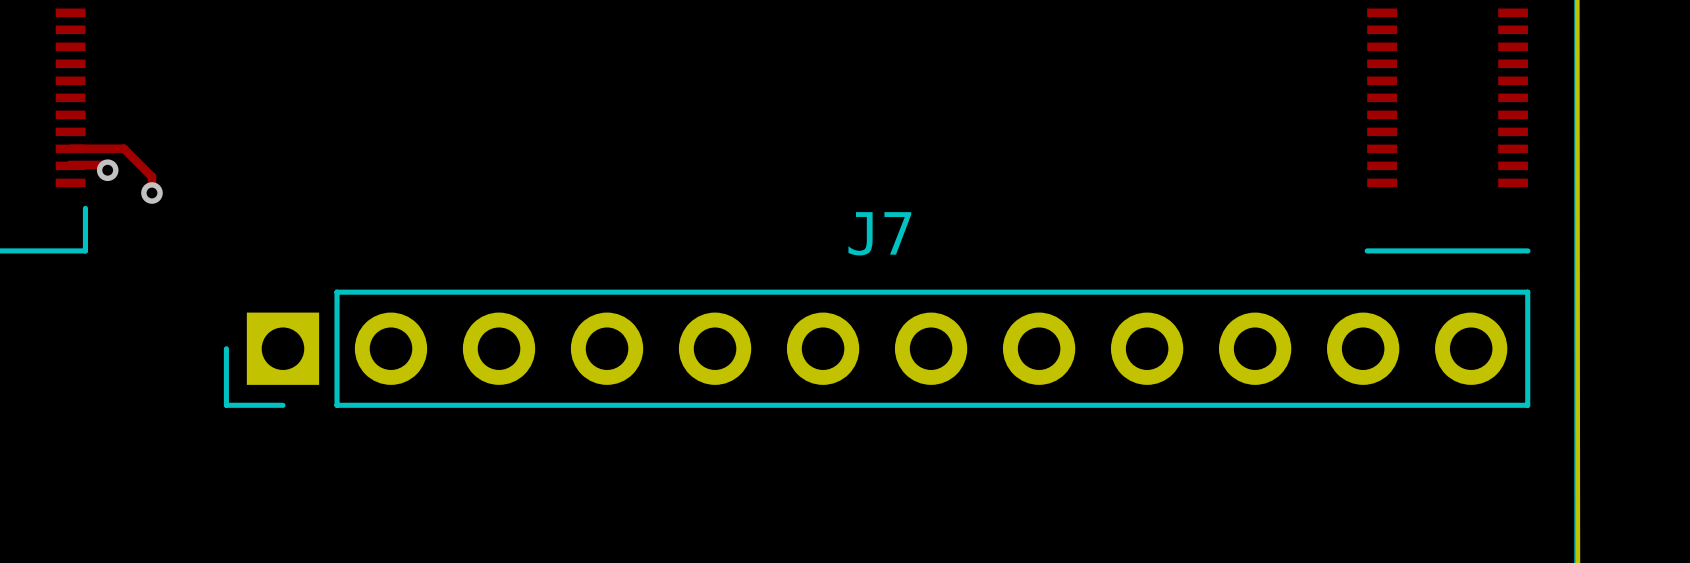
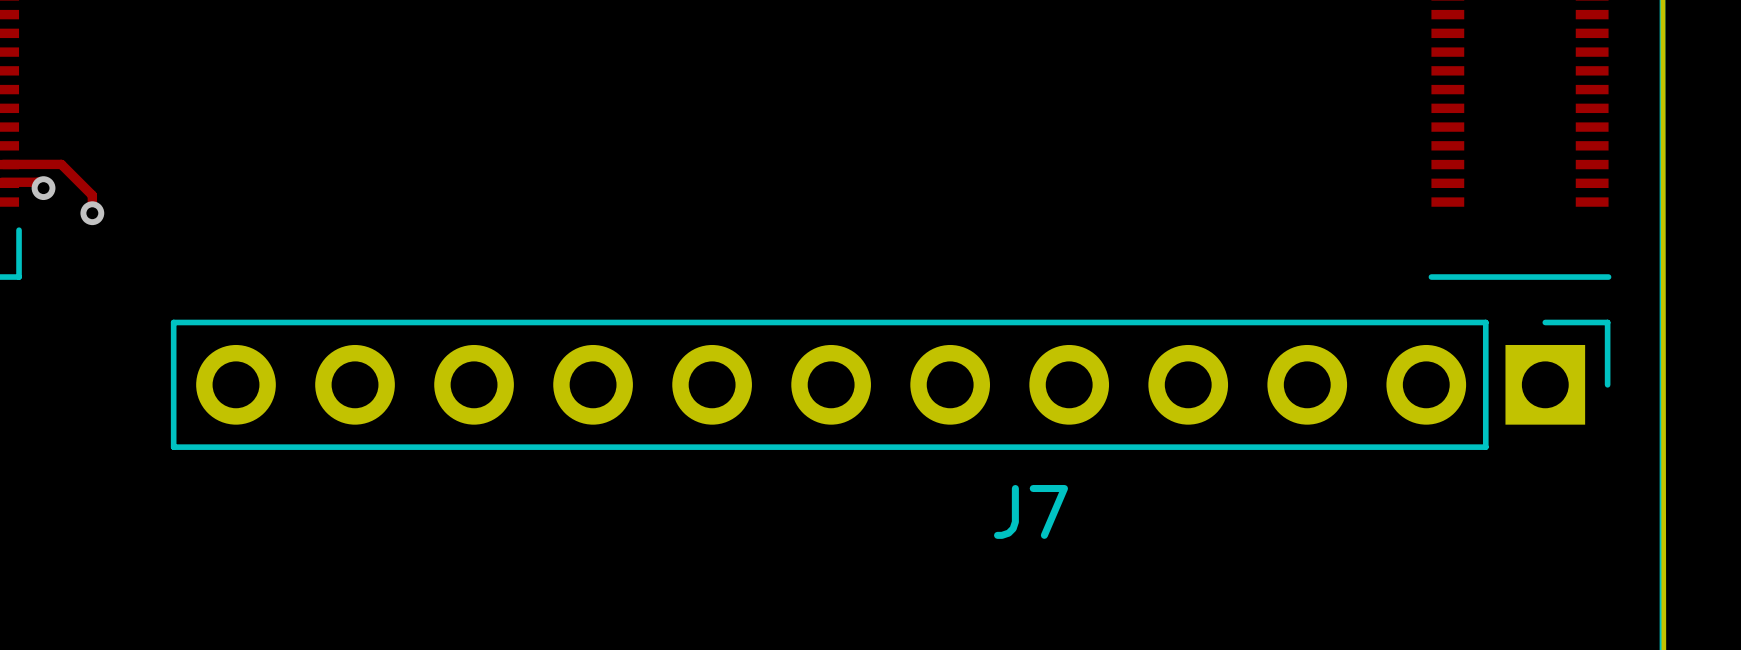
J7 name position: J7 (879, 233) -> J7 (1031, 511)
J7 rotation: 0° (877, 348) -> 180° (890, 384)

